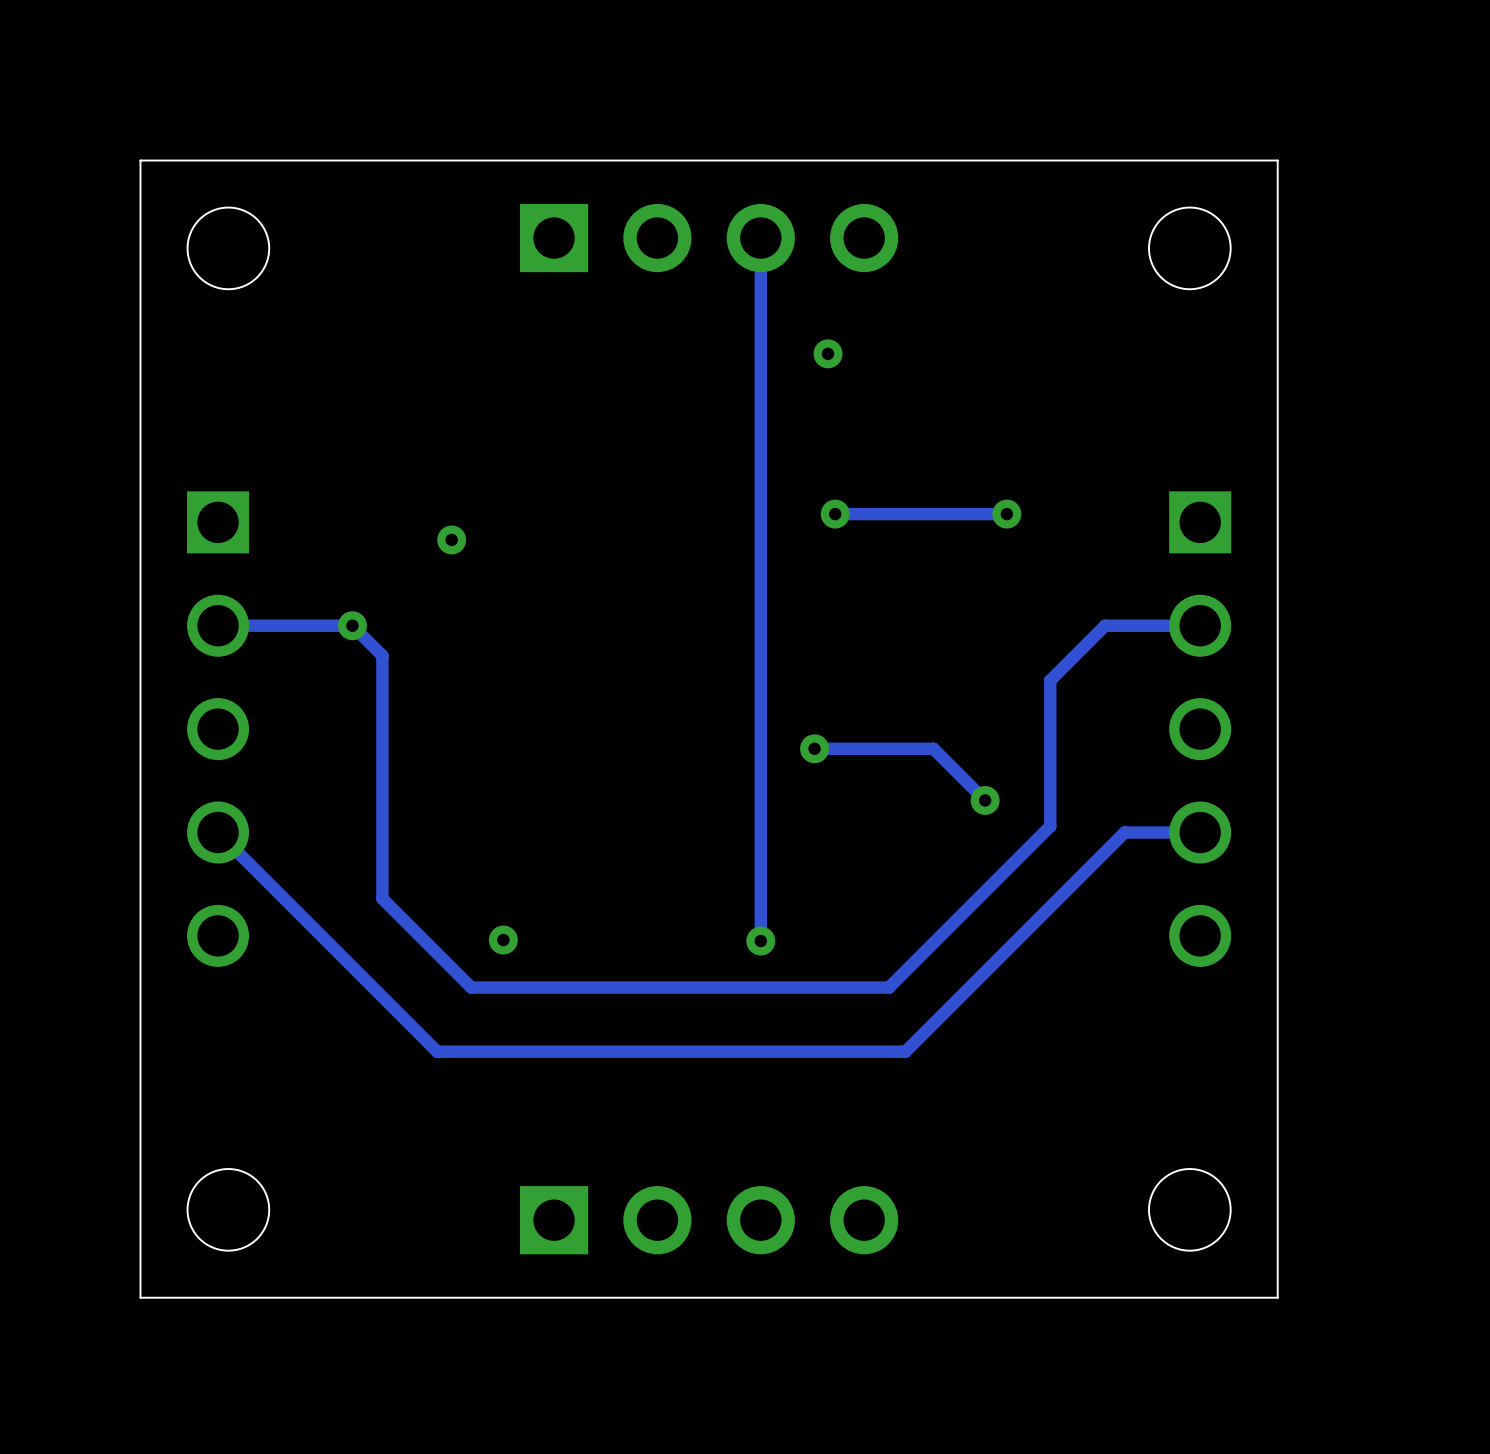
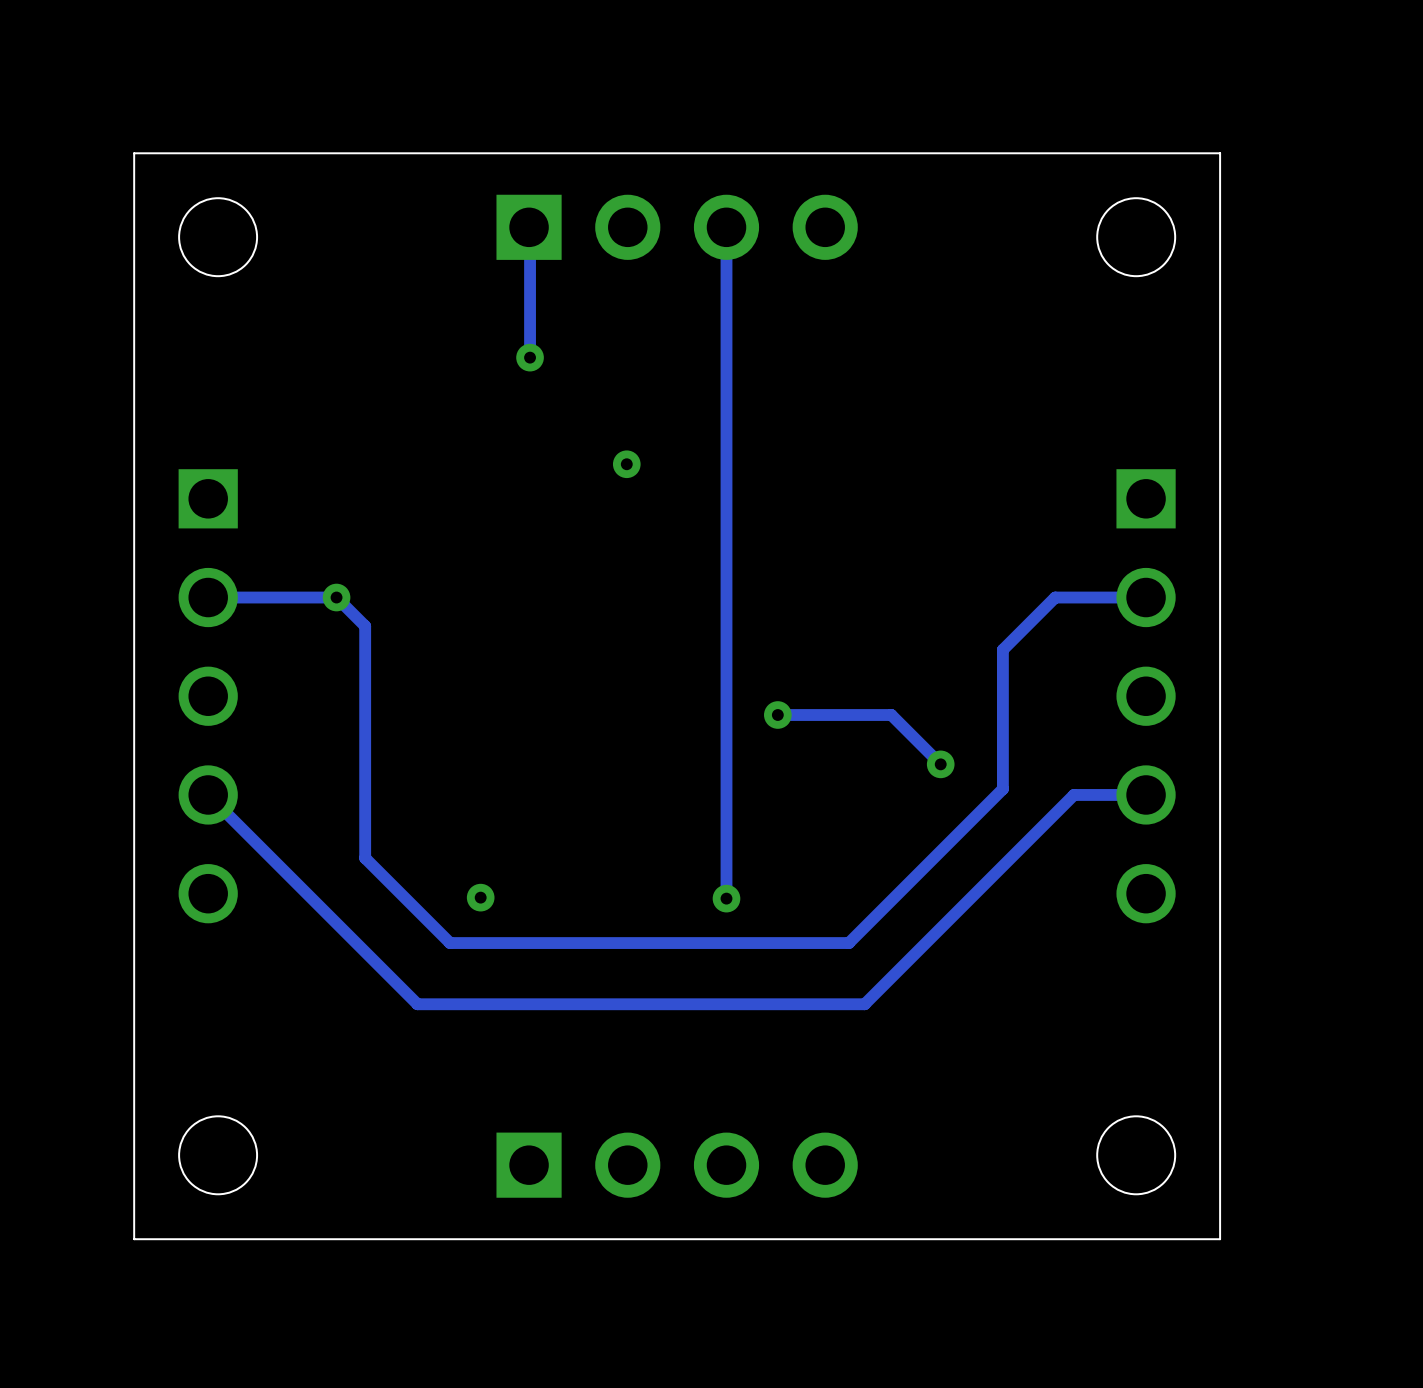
track: none -> (530, 228) (530, 357)
via: (828, 353) -> none
via: none -> (530, 357)
via: none -> (626, 464)
via: (835, 514) -> none
track: (1006, 514) (835, 514) -> none
via: (1006, 514) -> none
via: (451, 539) -> none

